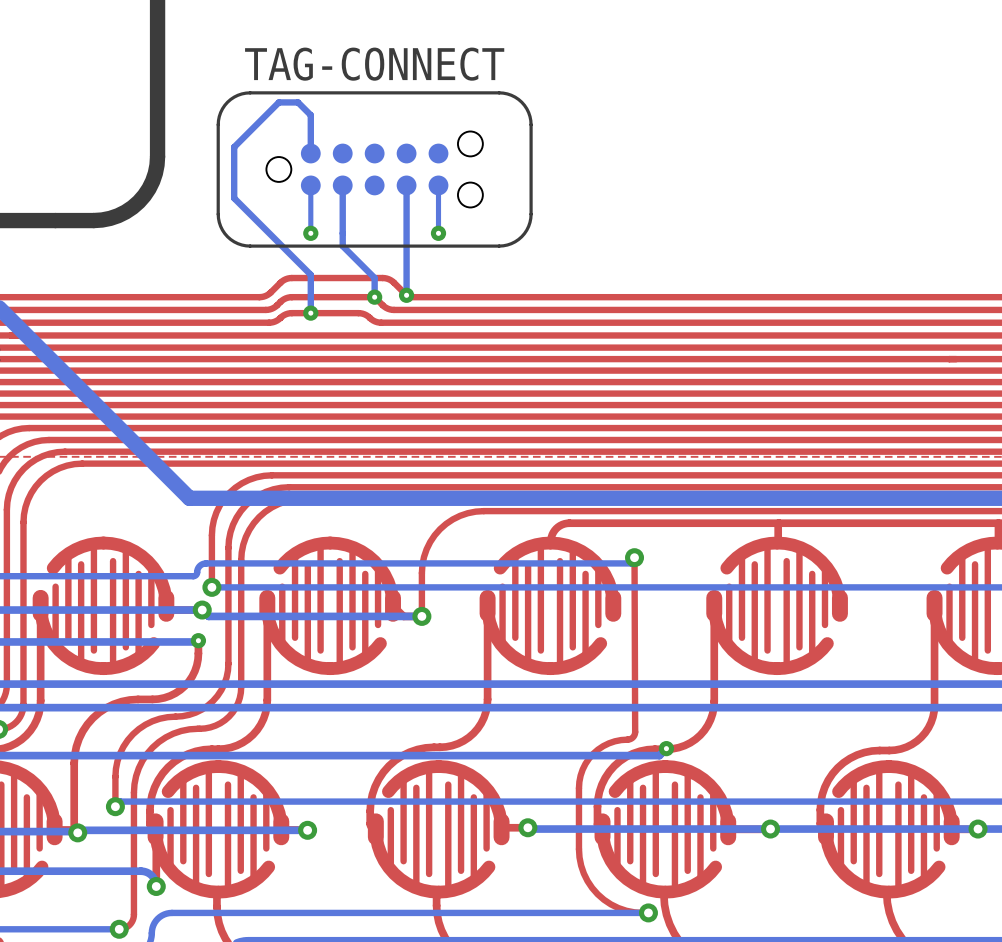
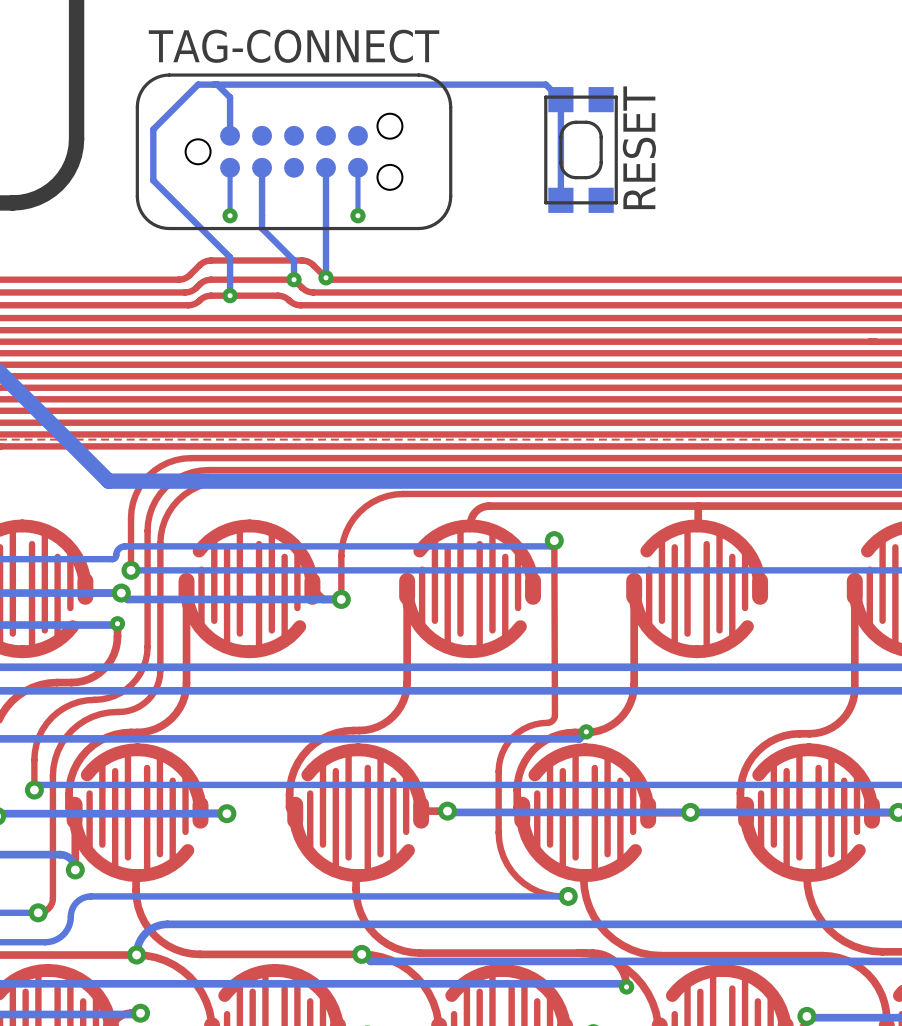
bottom track: none -> (217, 84) (545, 84) (560, 99) (560, 200)
text: none -> RESET (639, 147)
part: none -> (581, 149)

